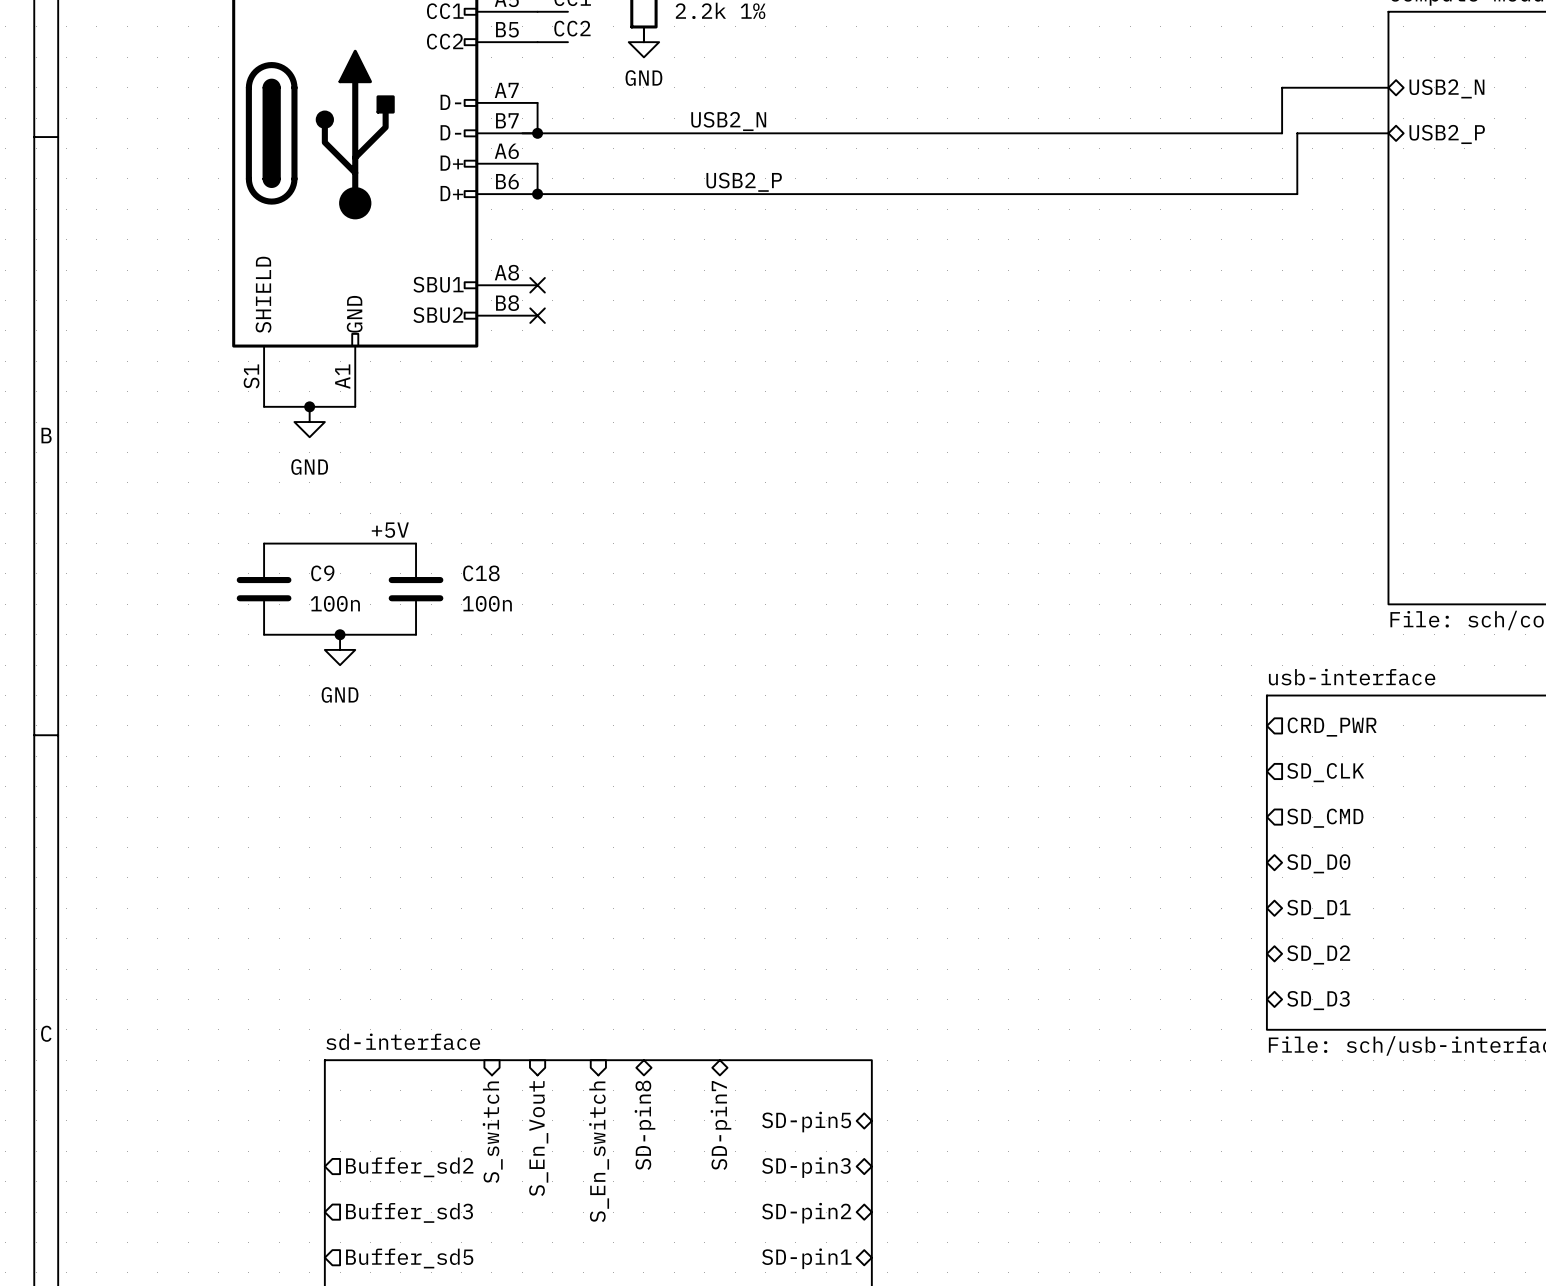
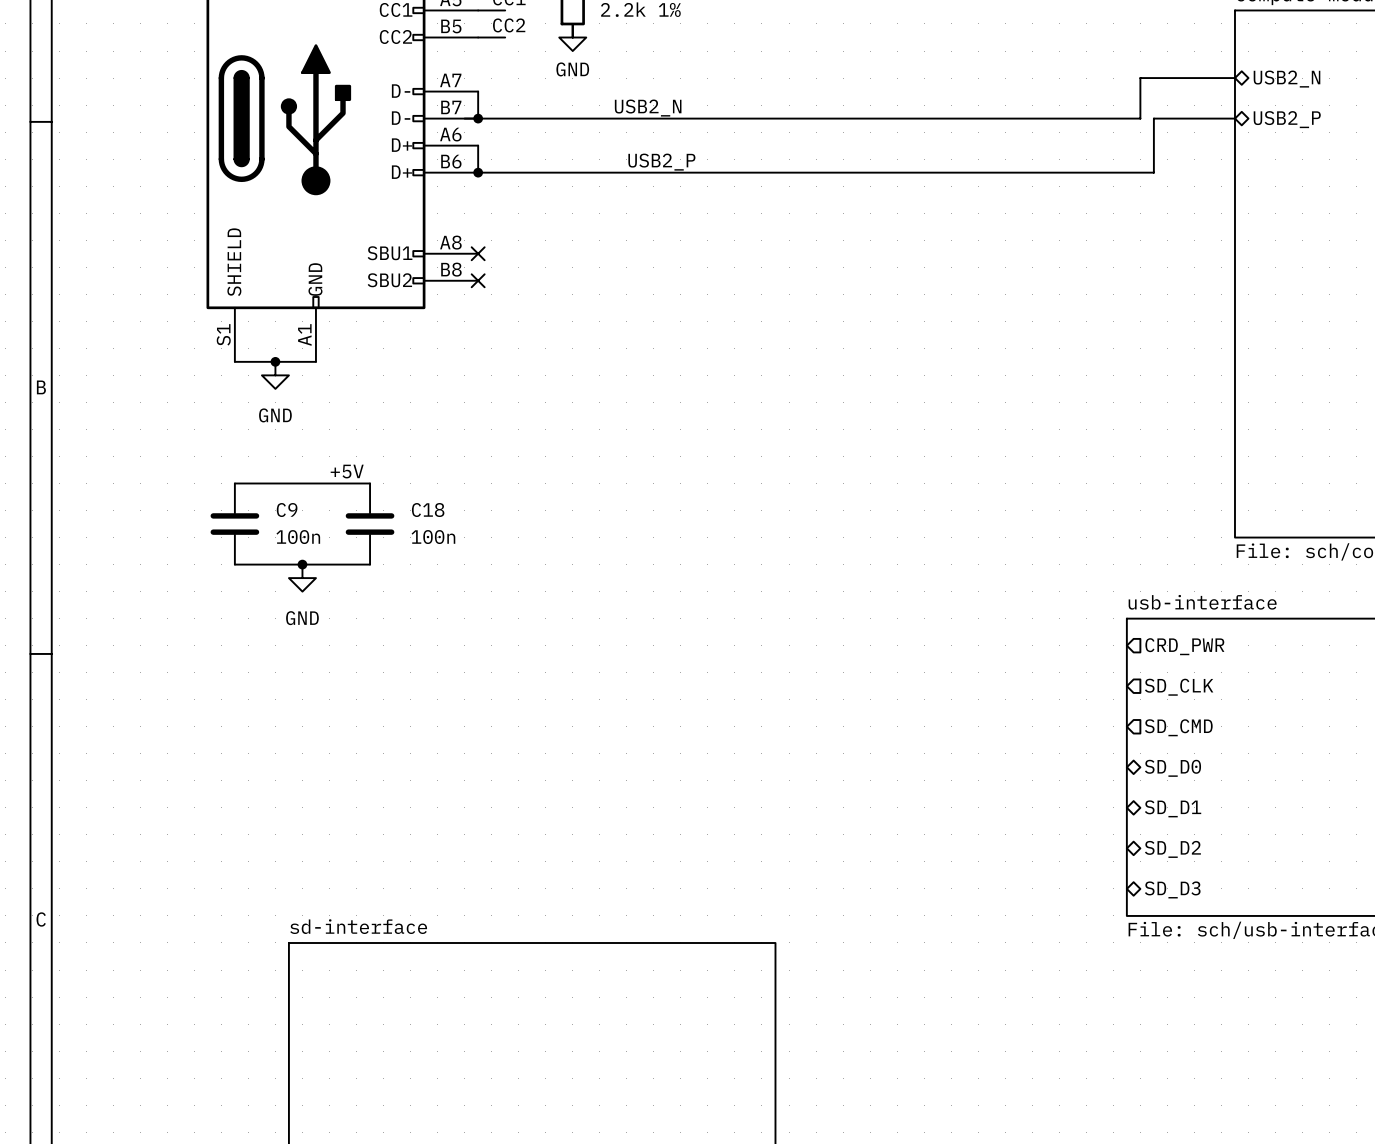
sheet pin: SD-pin5 (806, 1122) -> none
sheet pin: SD-pin8 (645, 1125) -> none
sheet pin: SD-pin7 (720, 1125) -> none
sheet pin: S_switch (492, 1132) -> none
sheet pin: S_En_Vout (538, 1138) -> none
sheet pin: S_En_switch (599, 1151) -> none
sheet pin: Buffer_sd2 (409, 1167) -> none
sheet pin: SD-pin3 (806, 1167) -> none
sheet pin: Buffer_sd3 (409, 1212) -> none
sheet pin: SD-pin2 (806, 1213) -> none
sheet pin: Buffer_sd5 (409, 1258) -> none
sheet pin: SD-pin1 (806, 1258) -> none

